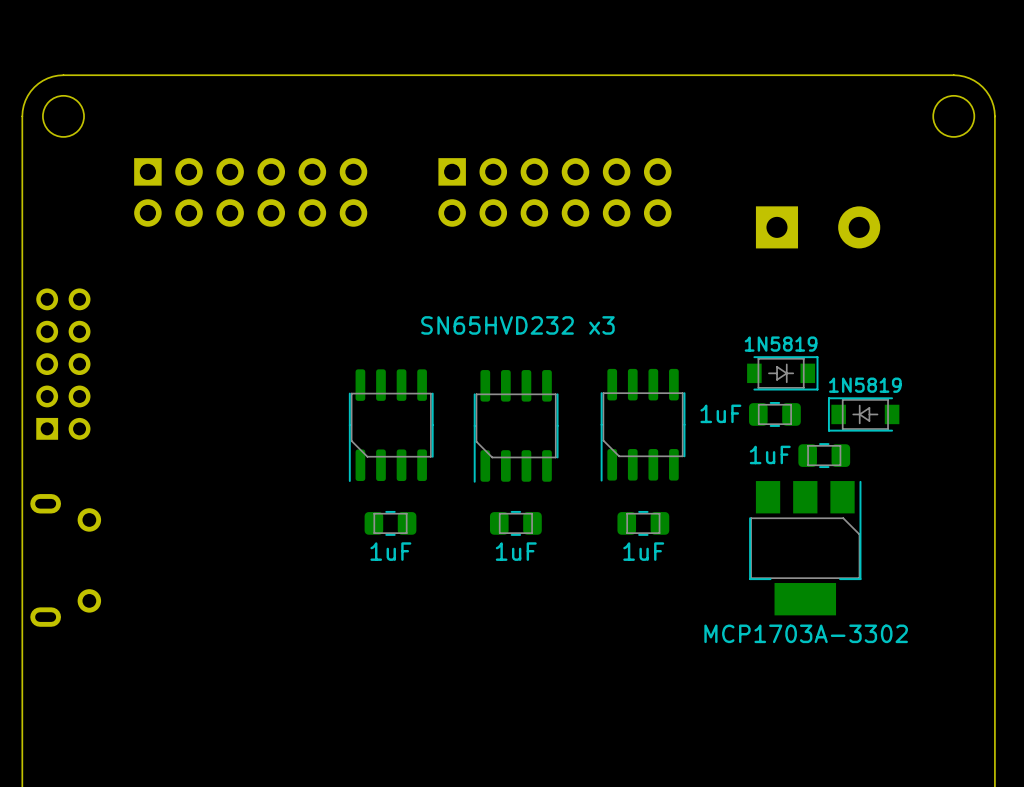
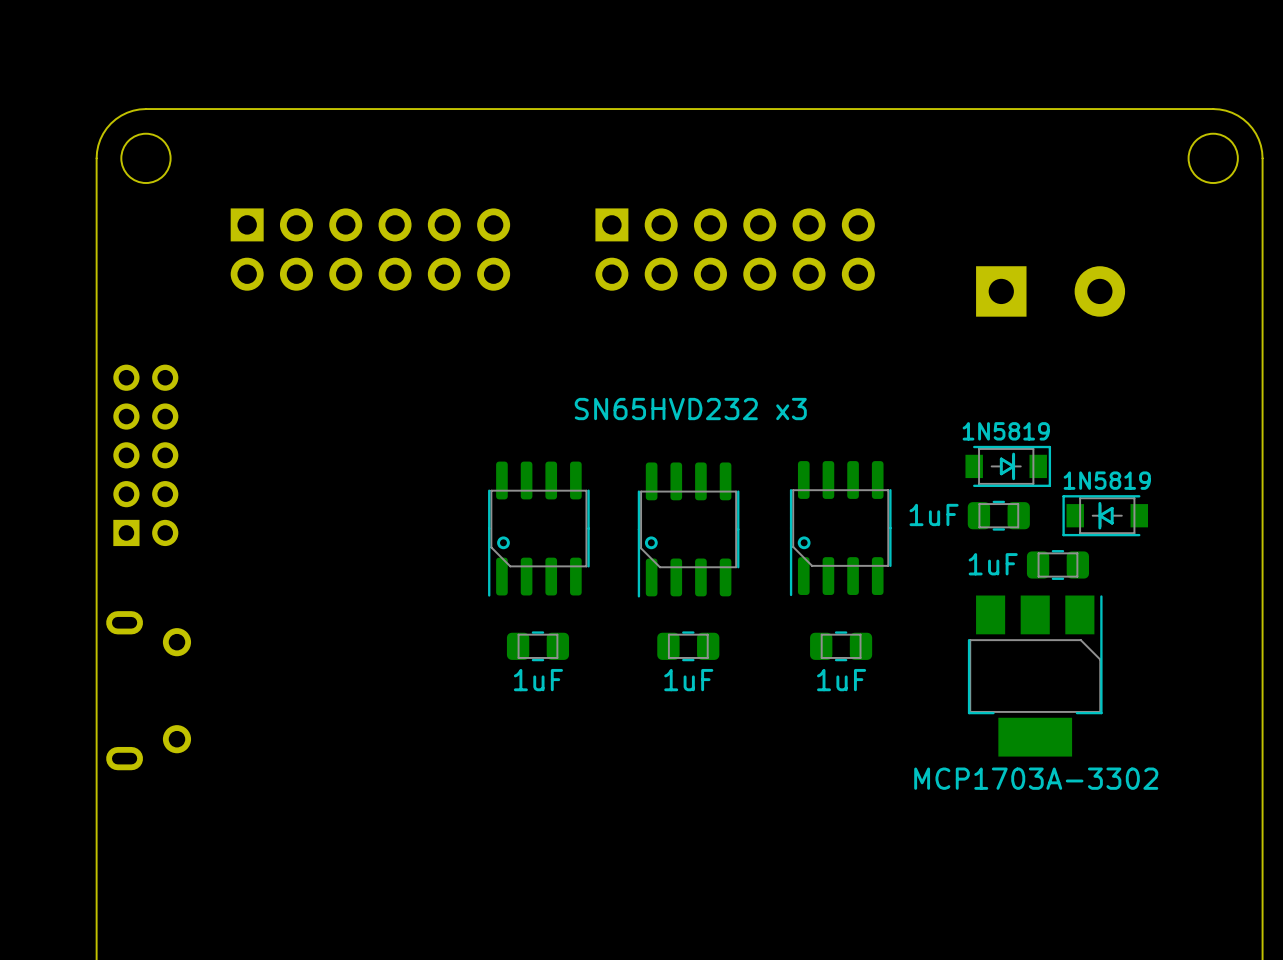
line: none -> (1013, 454) (1013, 478)
line: none -> (1001, 459) (1001, 473) (1013, 466) (1001, 459)
line: none -> (1099, 503) (1099, 528)
line: none -> (1112, 508) (1112, 523) (1099, 515) (1112, 508)
drawing: none -> [497, 536, 510, 550]
drawing: none -> [644, 536, 658, 550]
drawing: none -> [797, 536, 811, 550]

